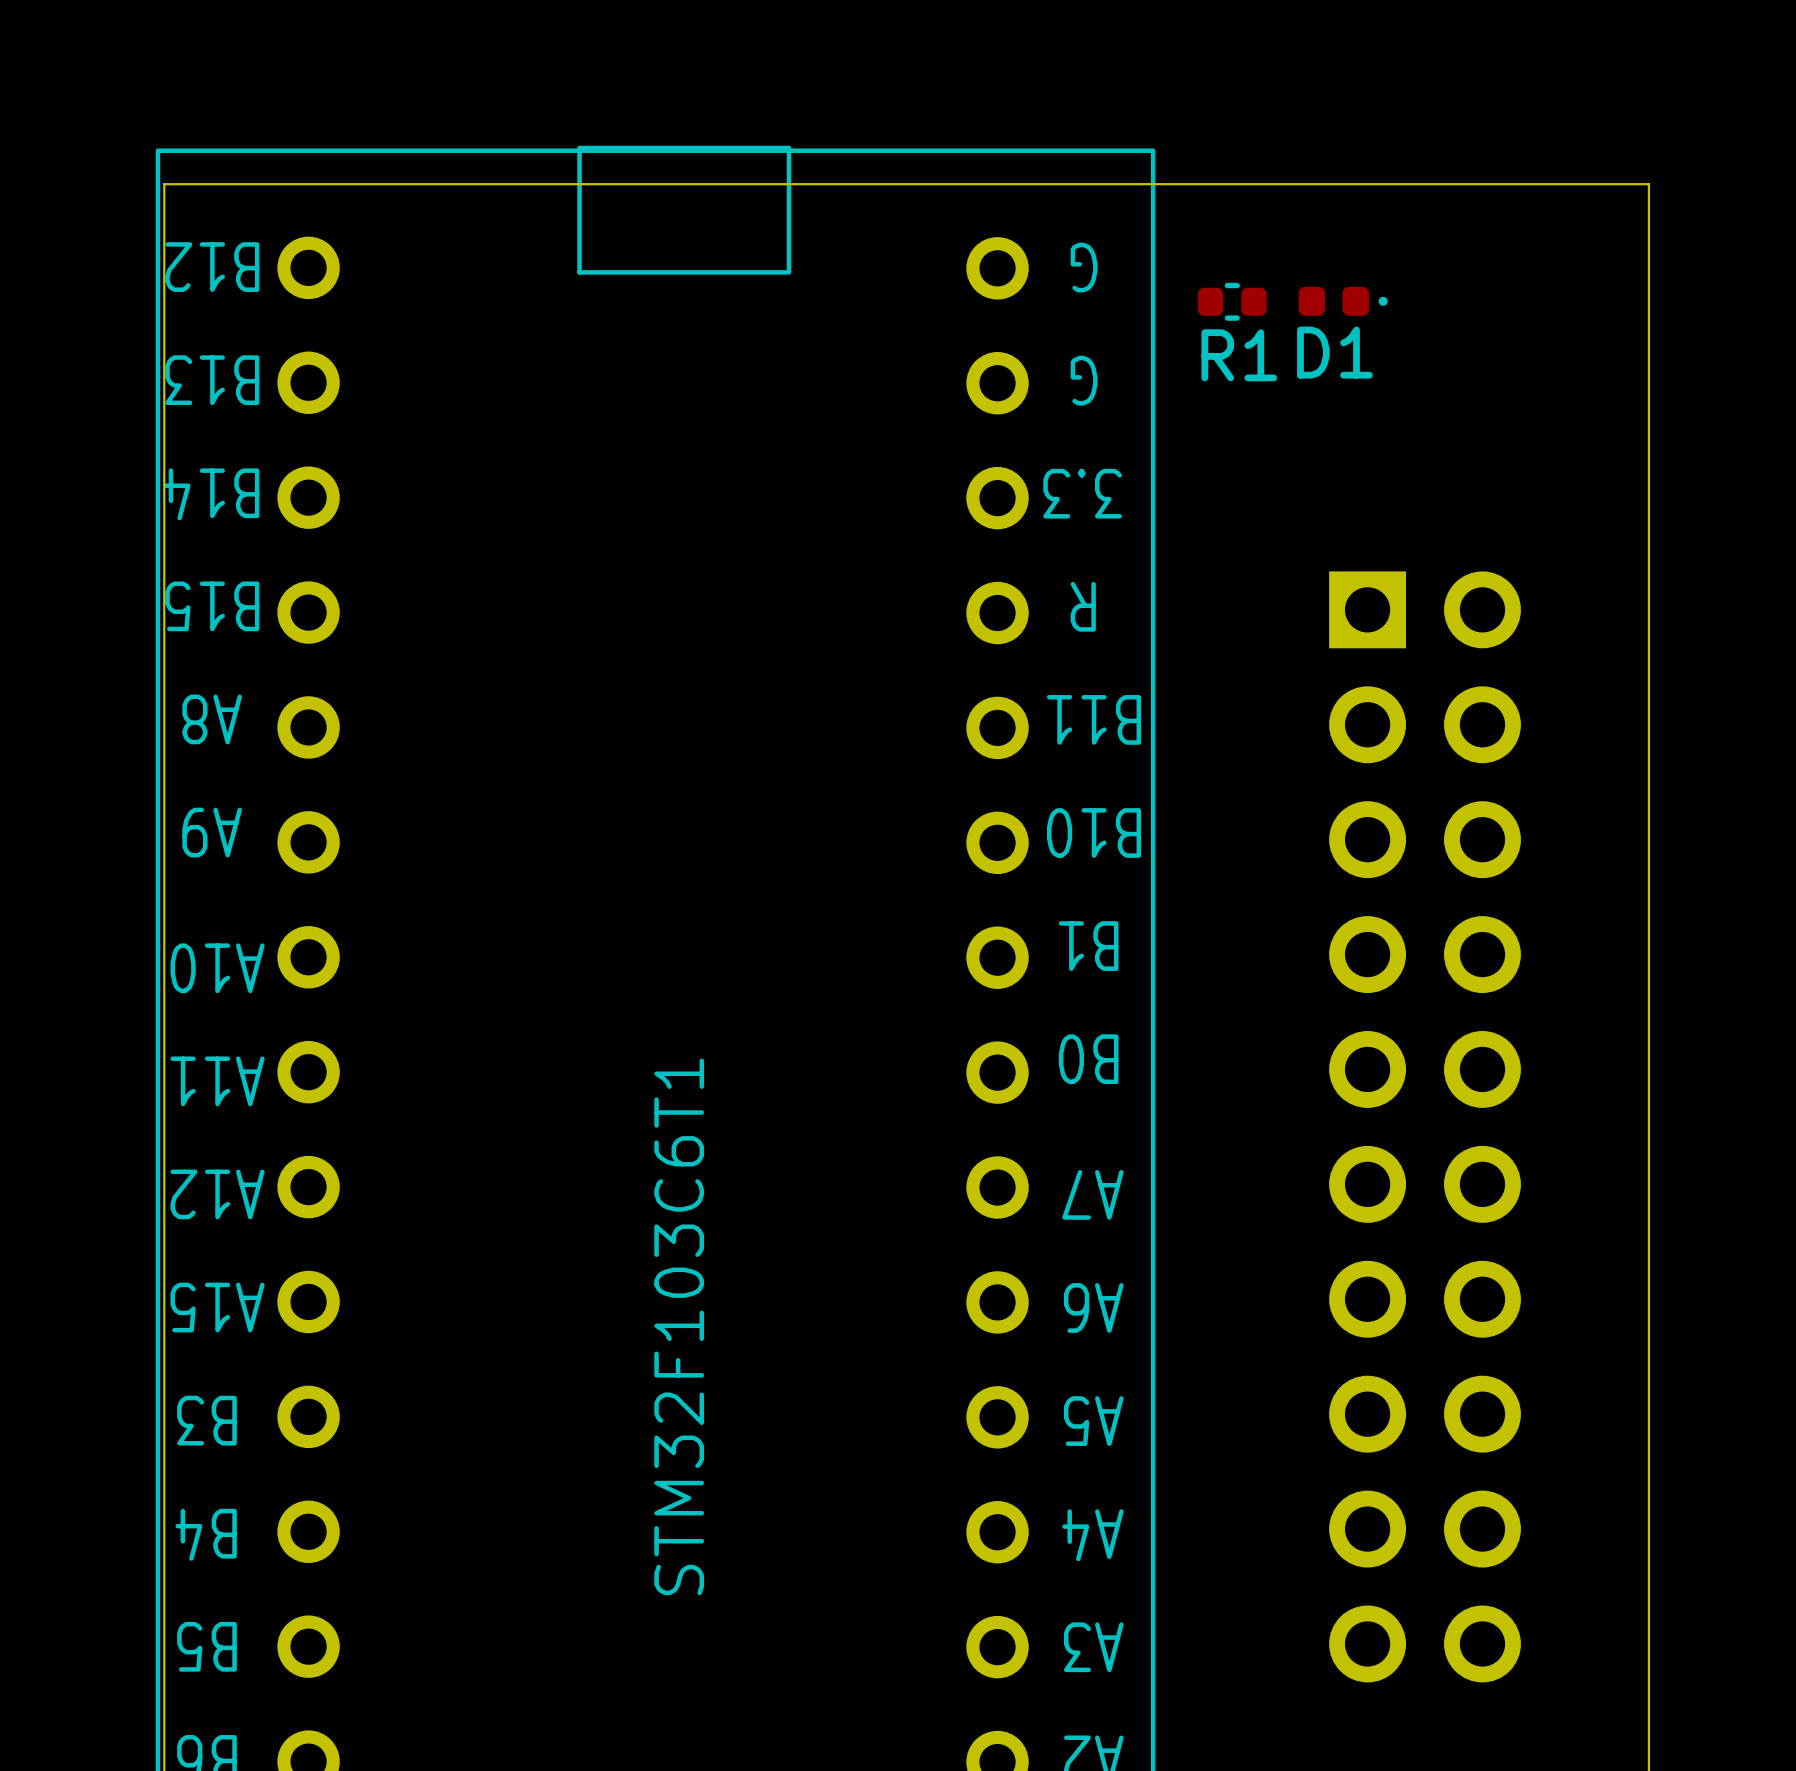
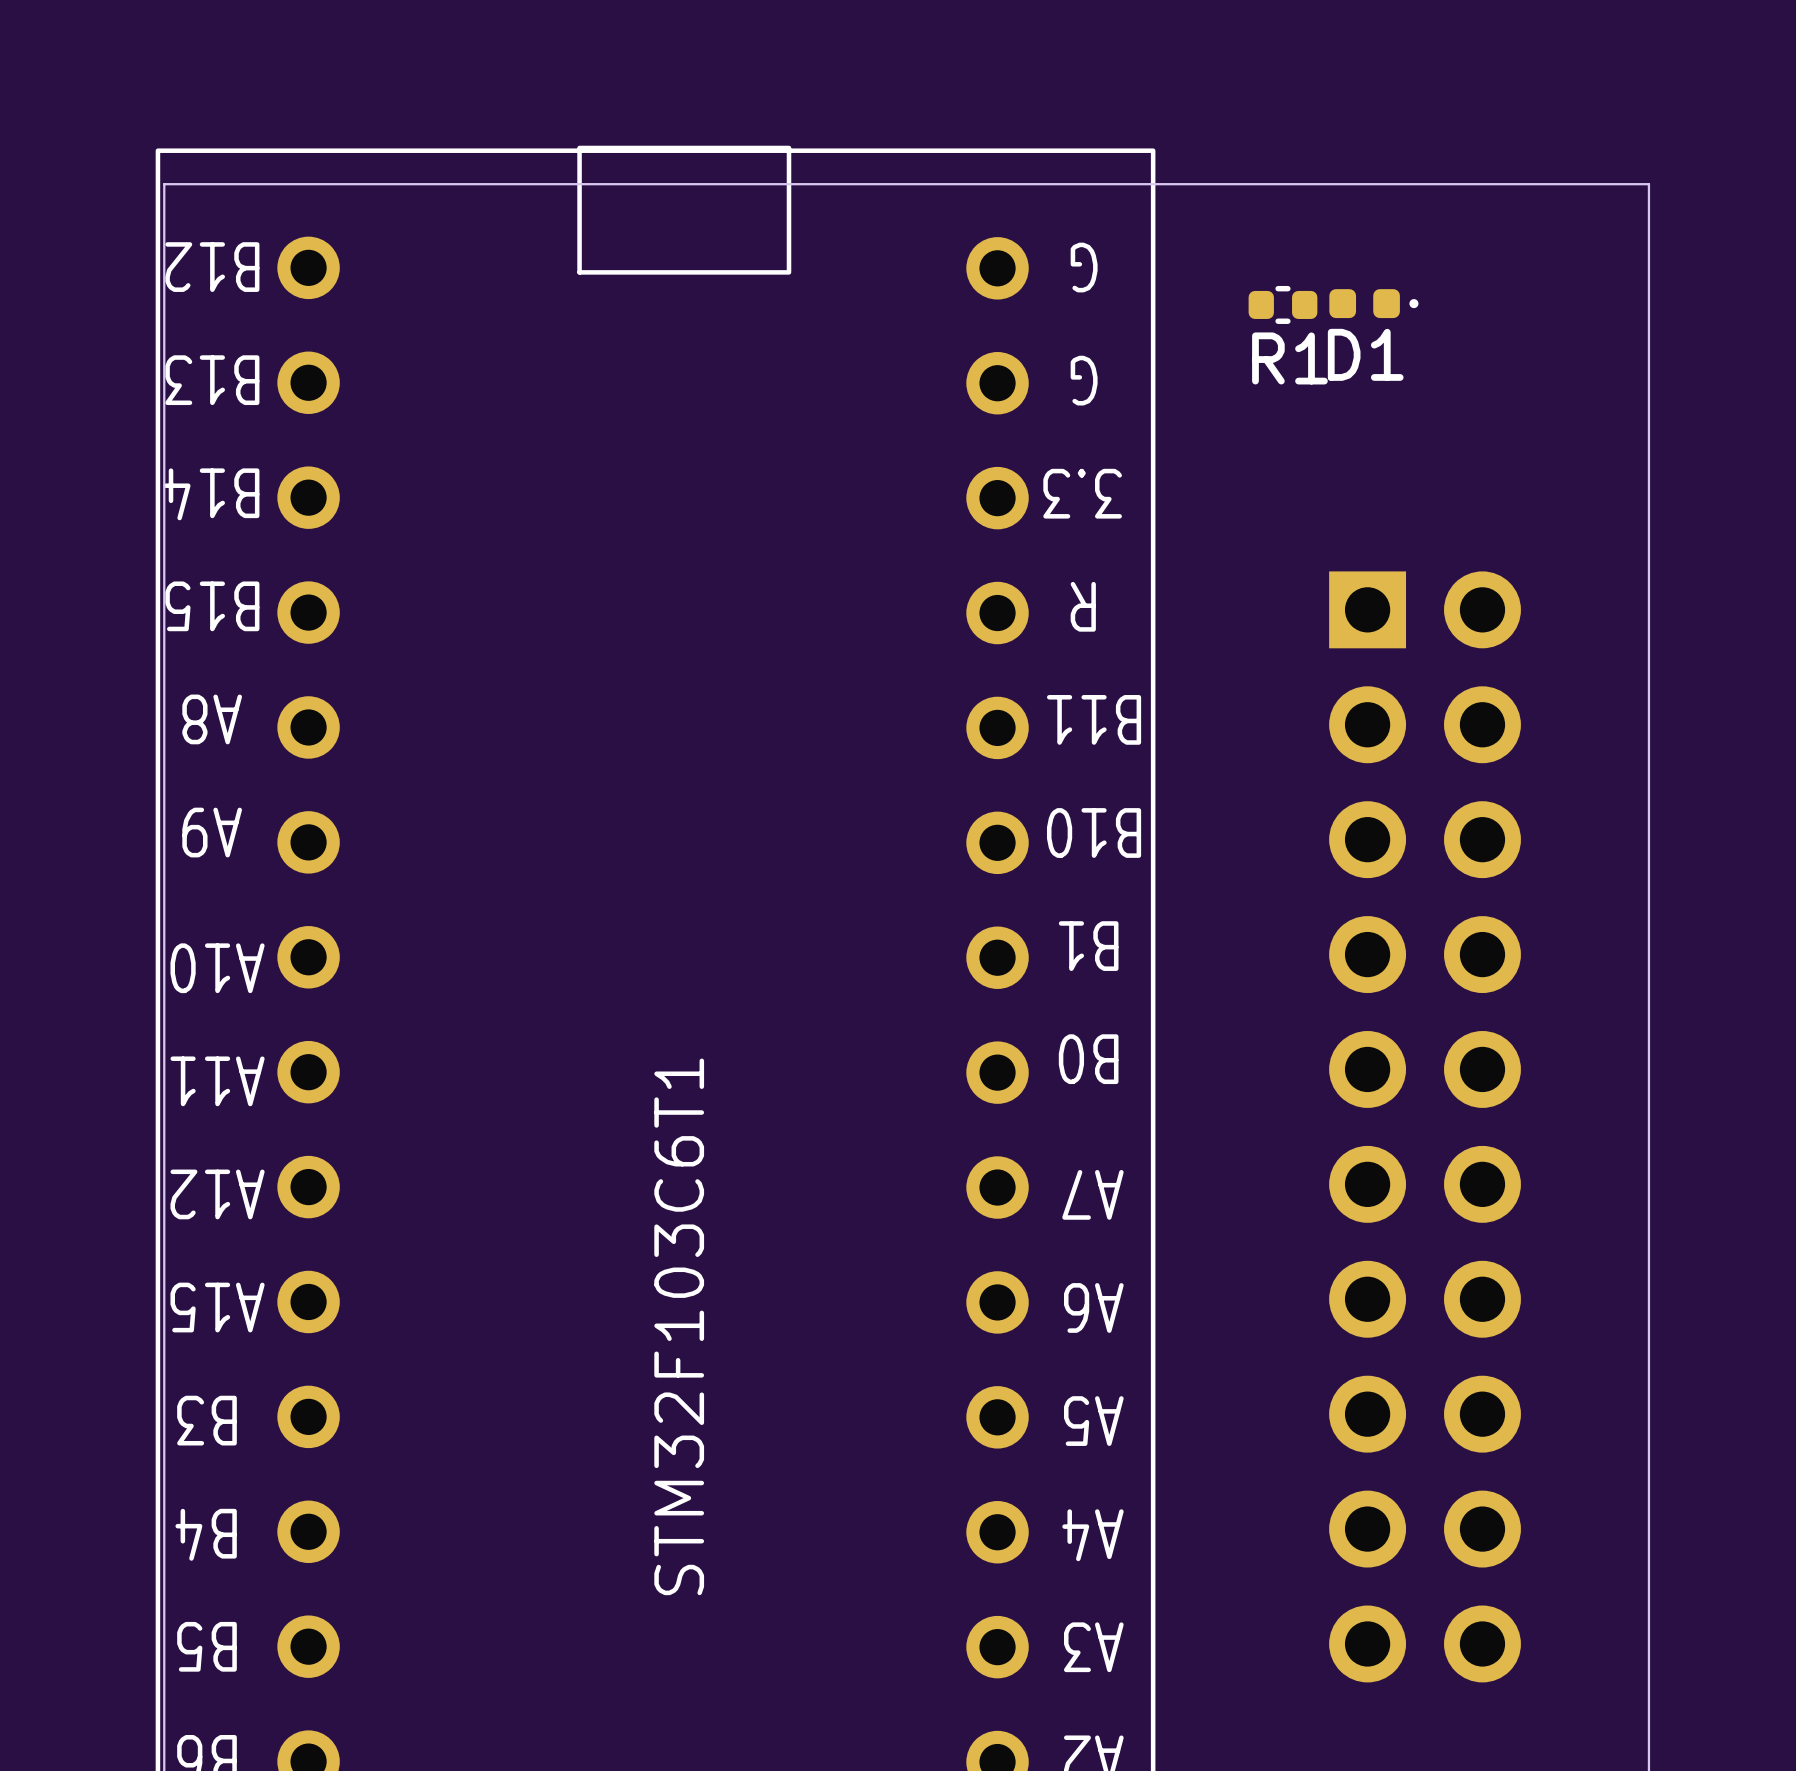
R1 position: (1232, 301) -> (1282, 304)
D1 position: (1343, 301) -> (1373, 303)

